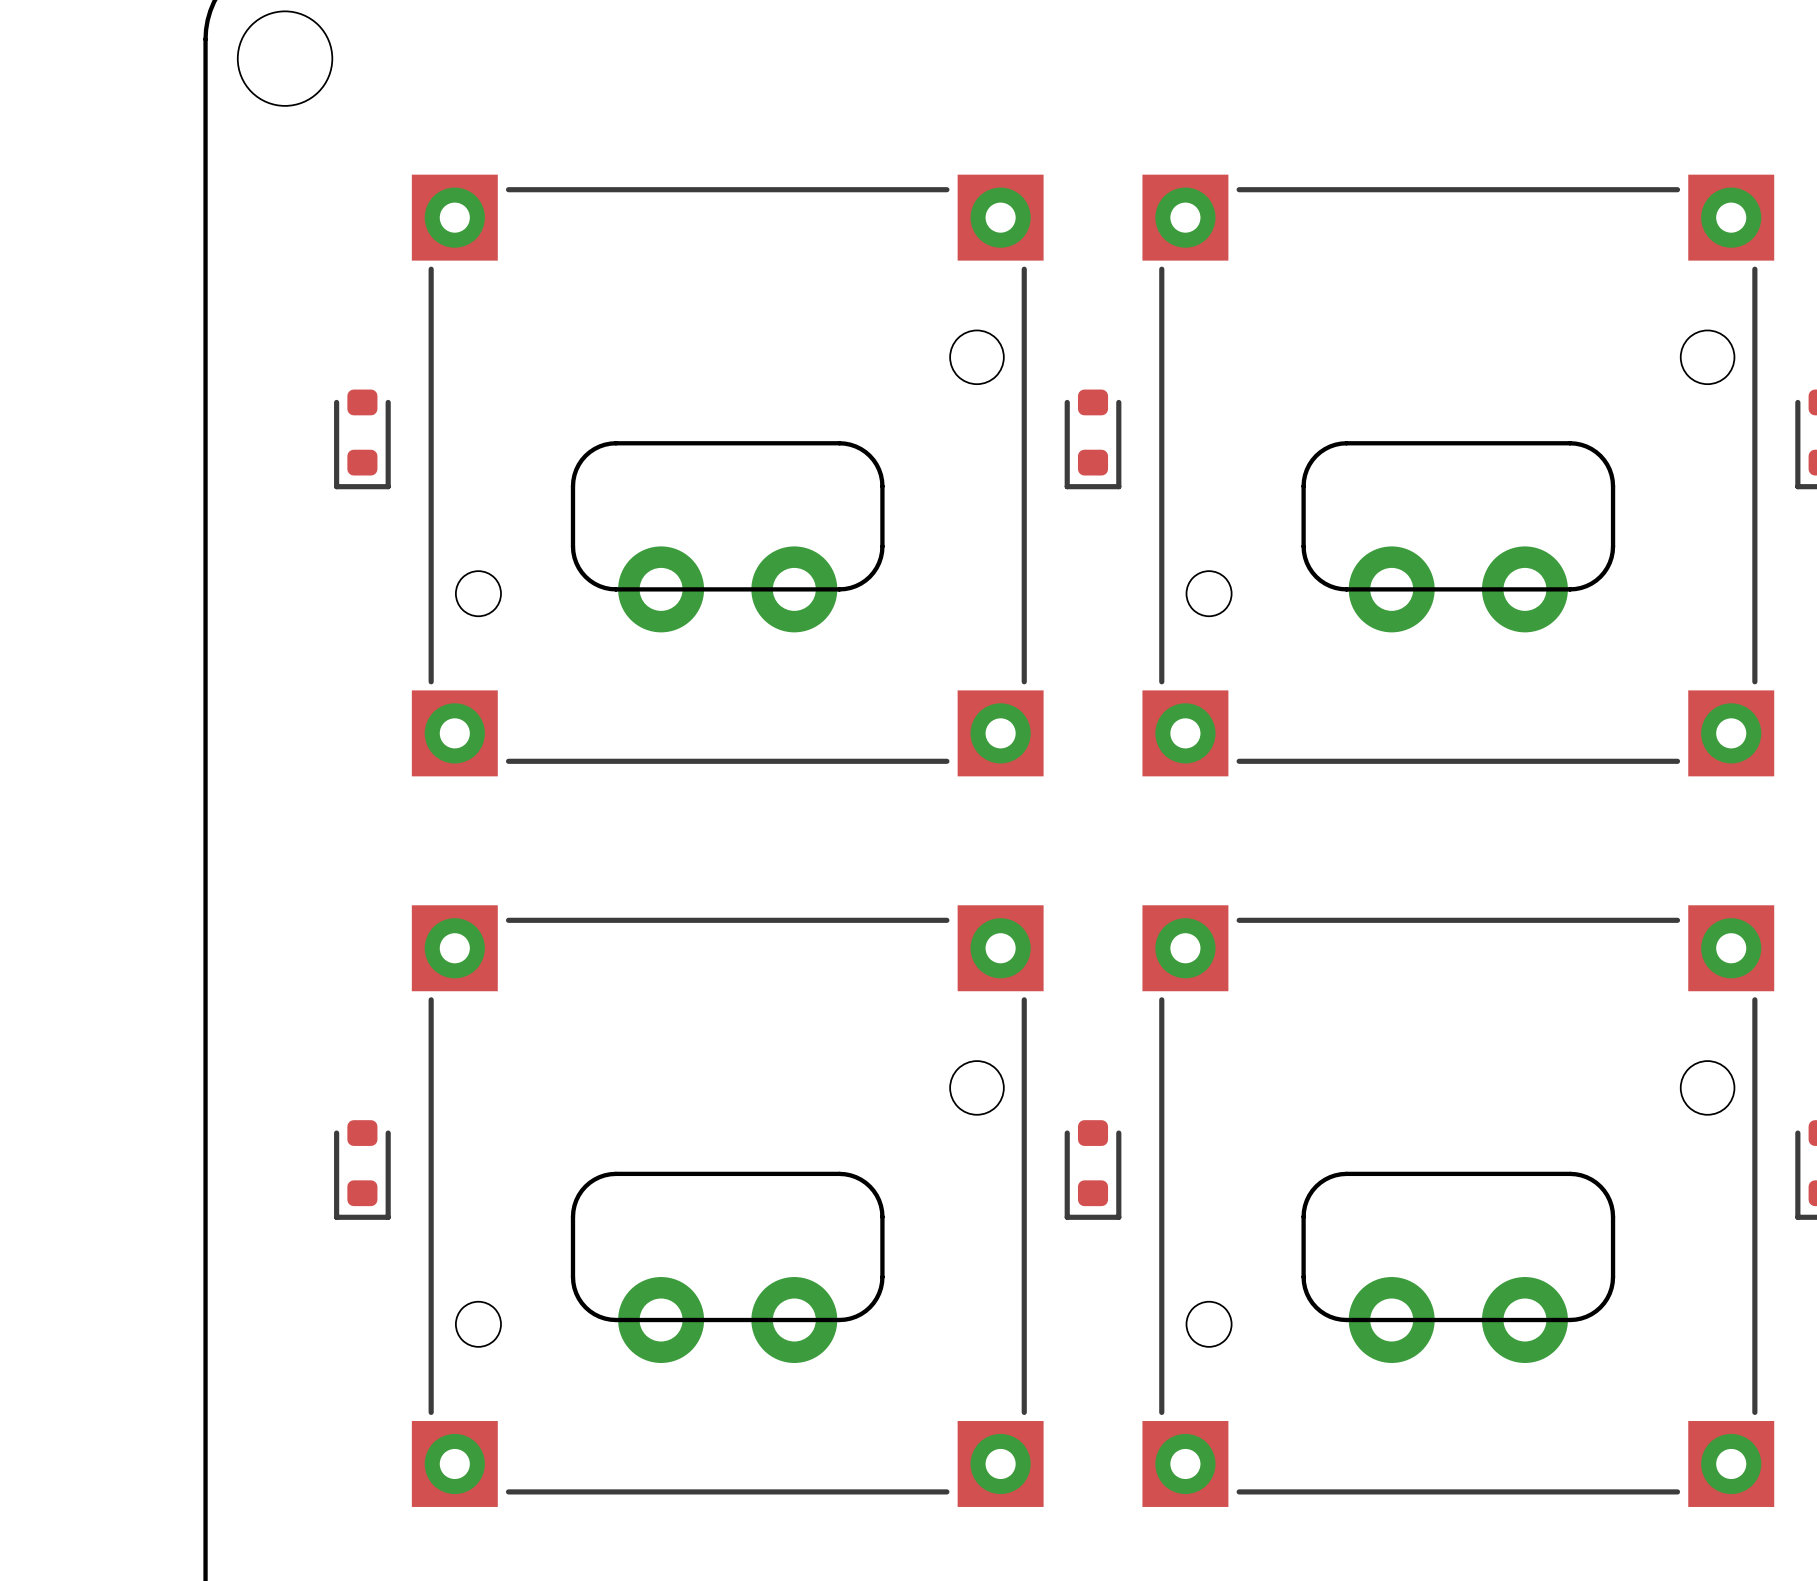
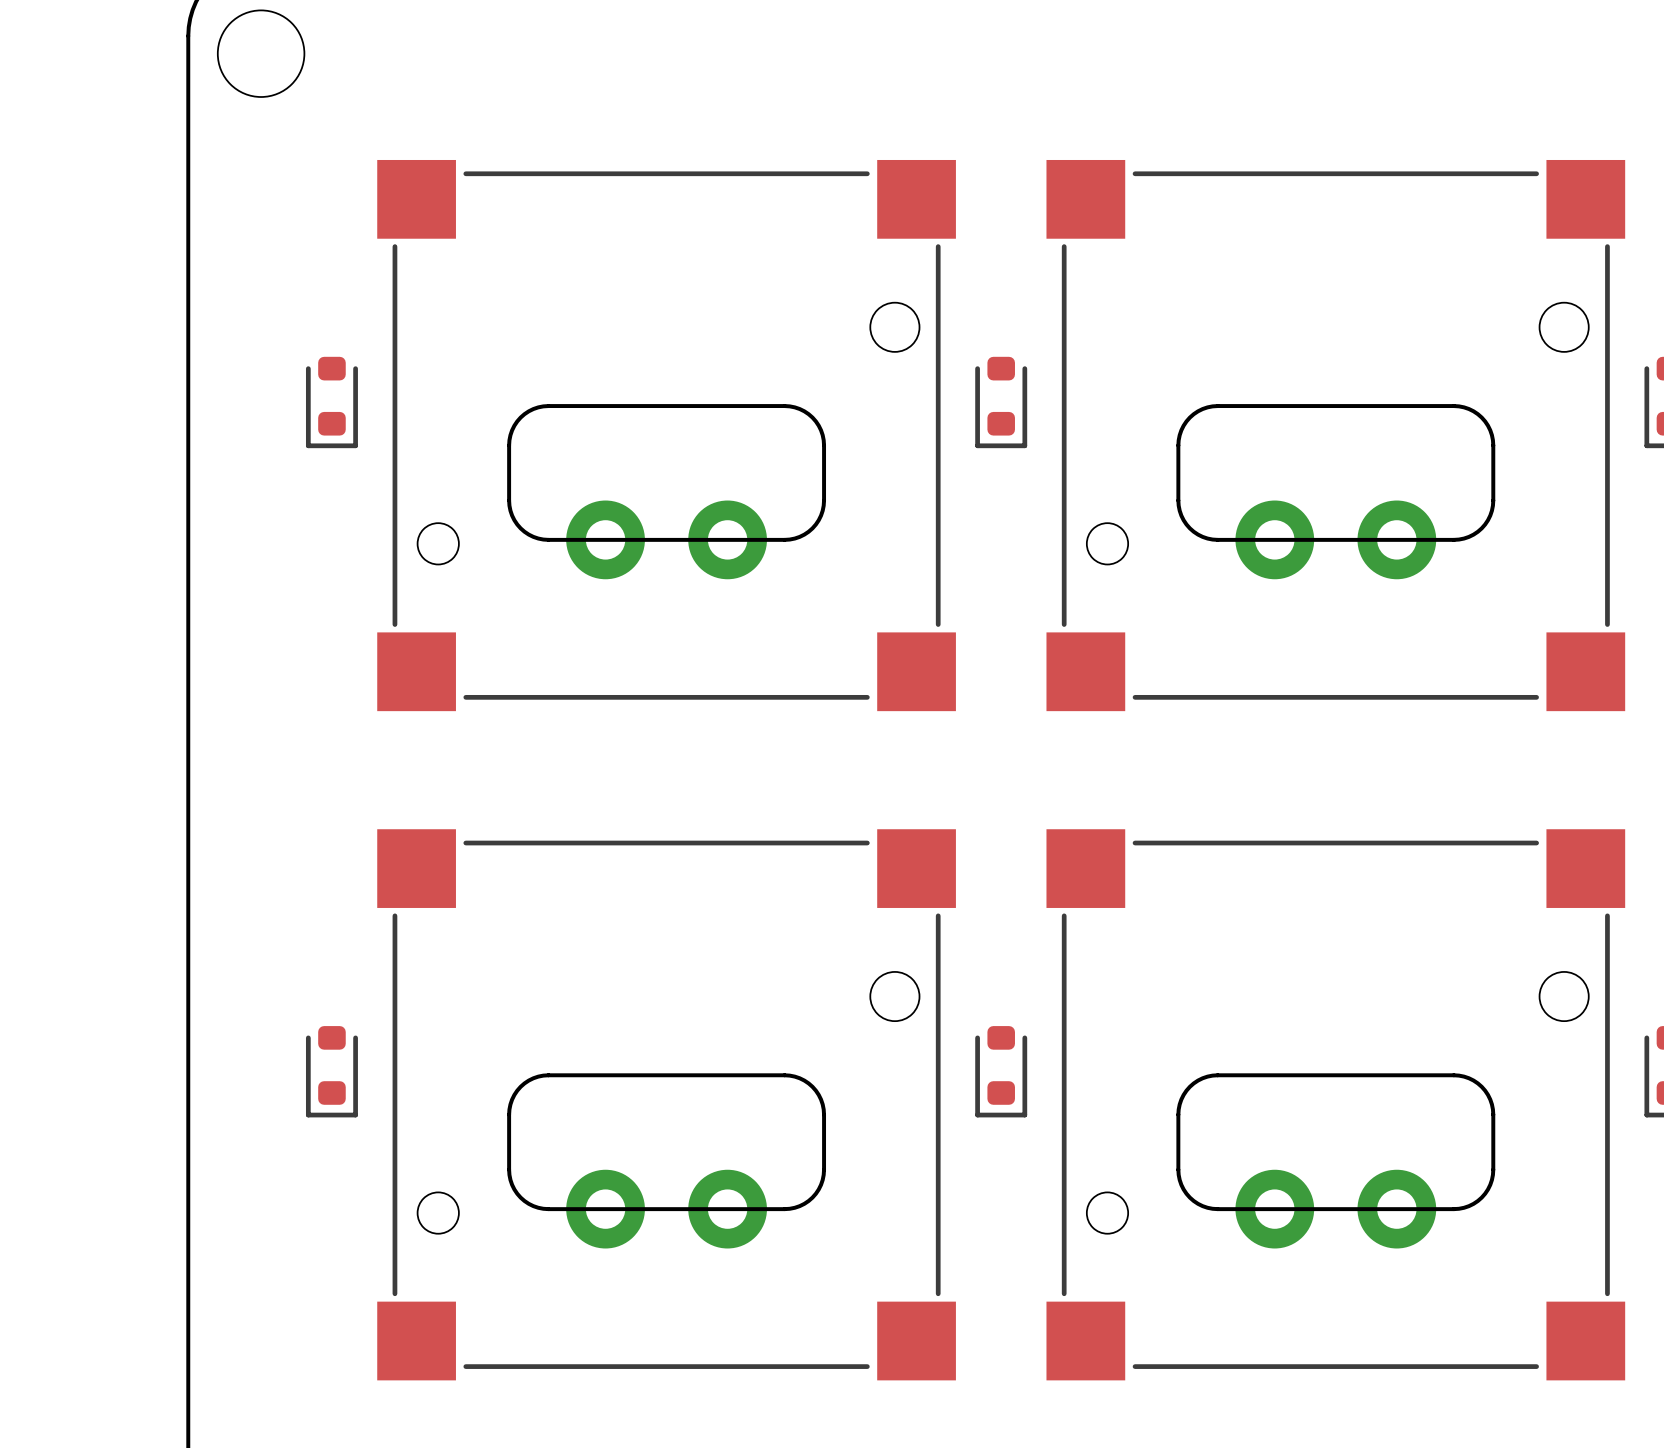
part footprint: [411, 174, 1044, 777] -> [377, 159, 956, 712]
part footprint: [1142, 174, 1775, 777] -> [1046, 159, 1626, 712]
part footprint: [411, 905, 1044, 1507] -> [377, 829, 956, 1381]
part footprint: [1142, 905, 1775, 1507] -> [1046, 829, 1626, 1381]

